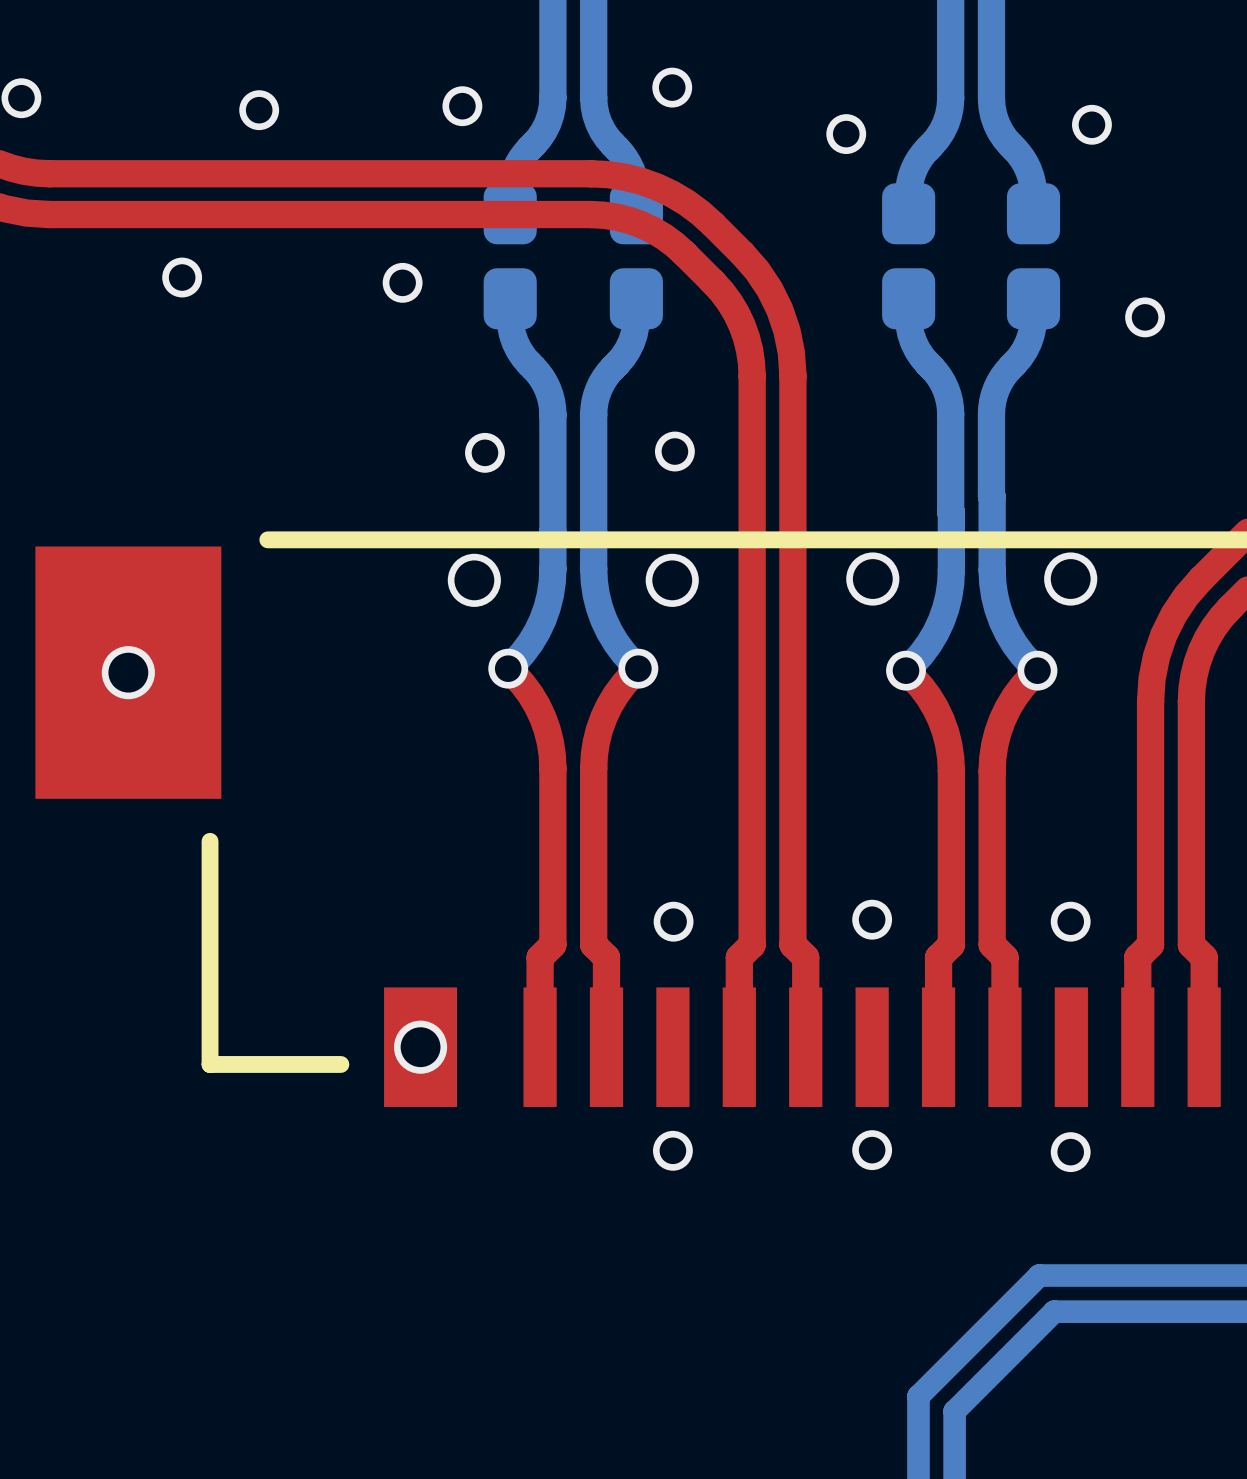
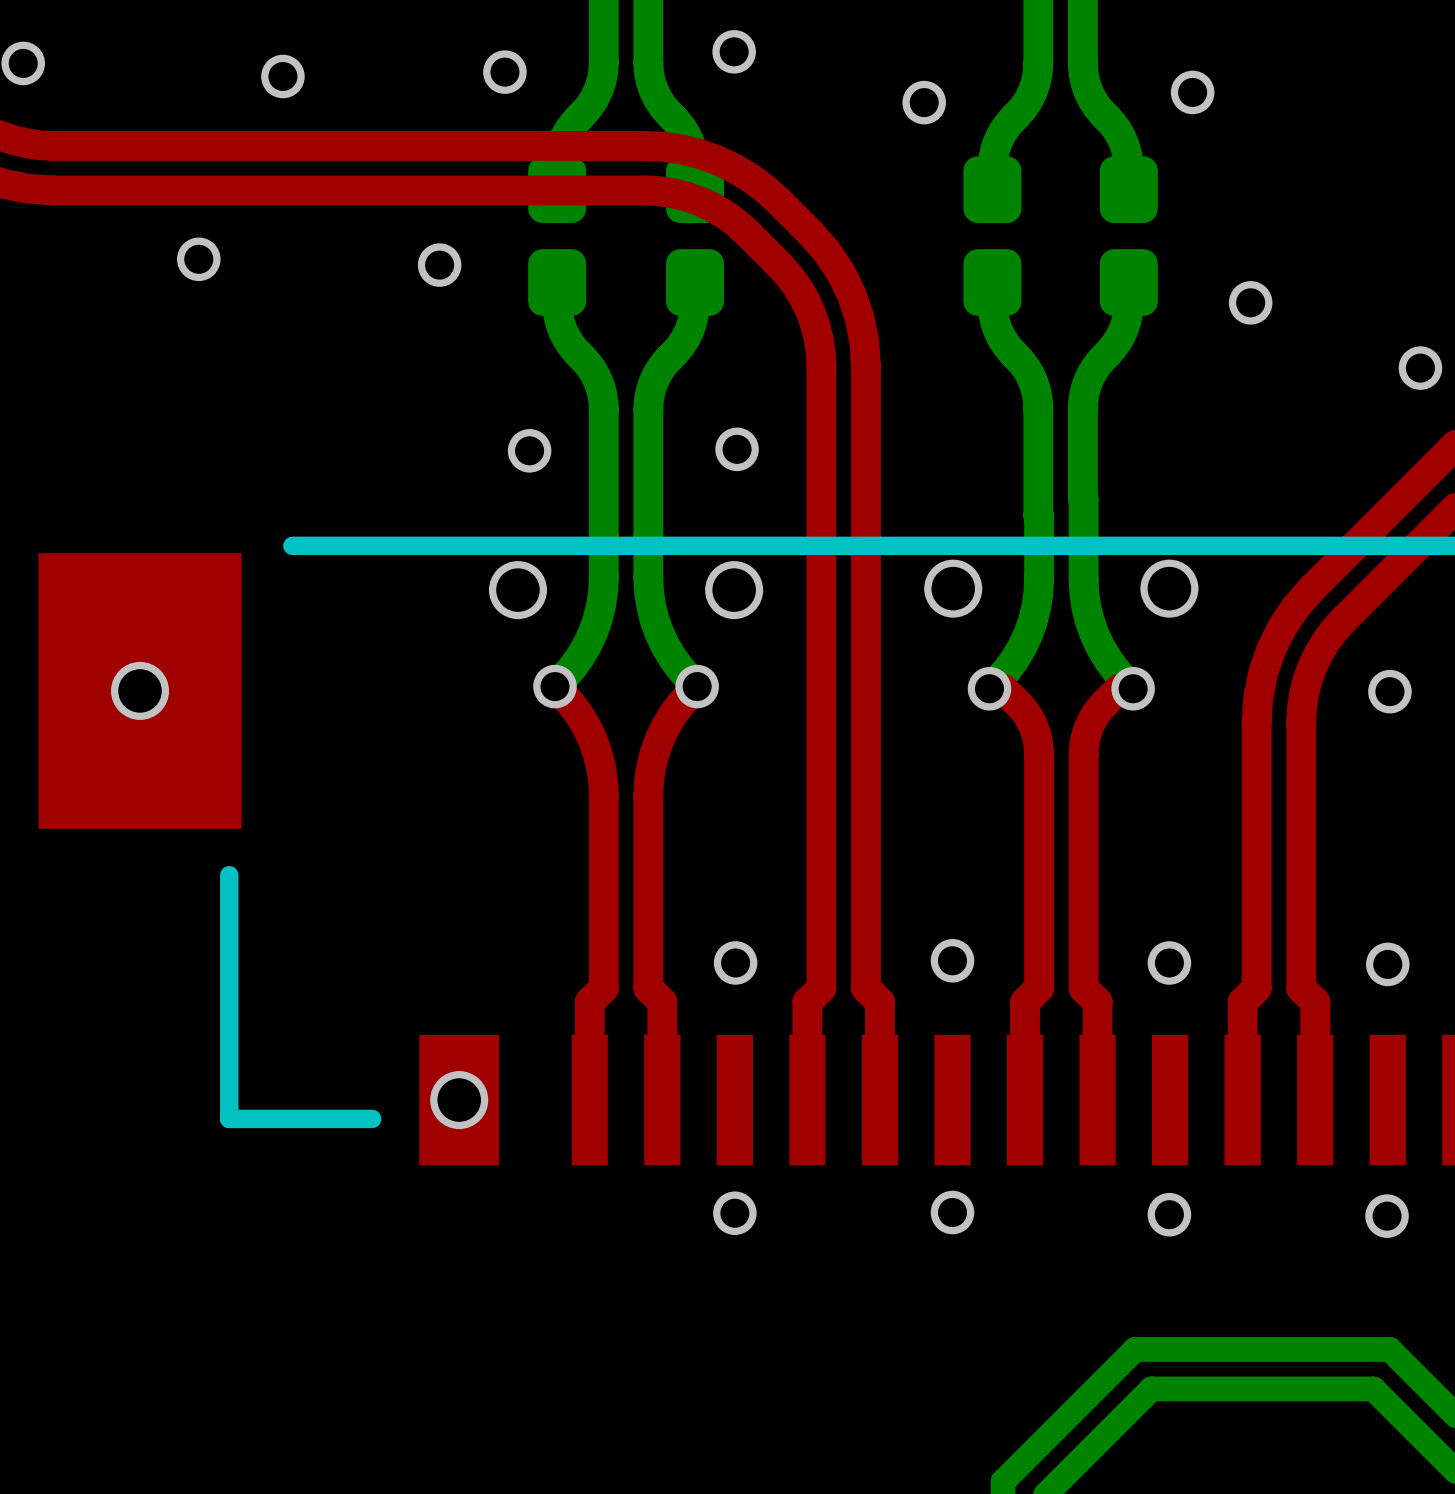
top track: (906, 670) (928, 697) (941, 720) (948, 745) (951, 771) -> (1003, 688) (1026, 714) (1035, 733) (1039, 754) (1039, 798)
top track: (1037, 670) (1014, 697) (1002, 720) (994, 745) (992, 771) -> (1119, 688) (1095, 714) (1086, 733) (1083, 754) (1083, 798)

